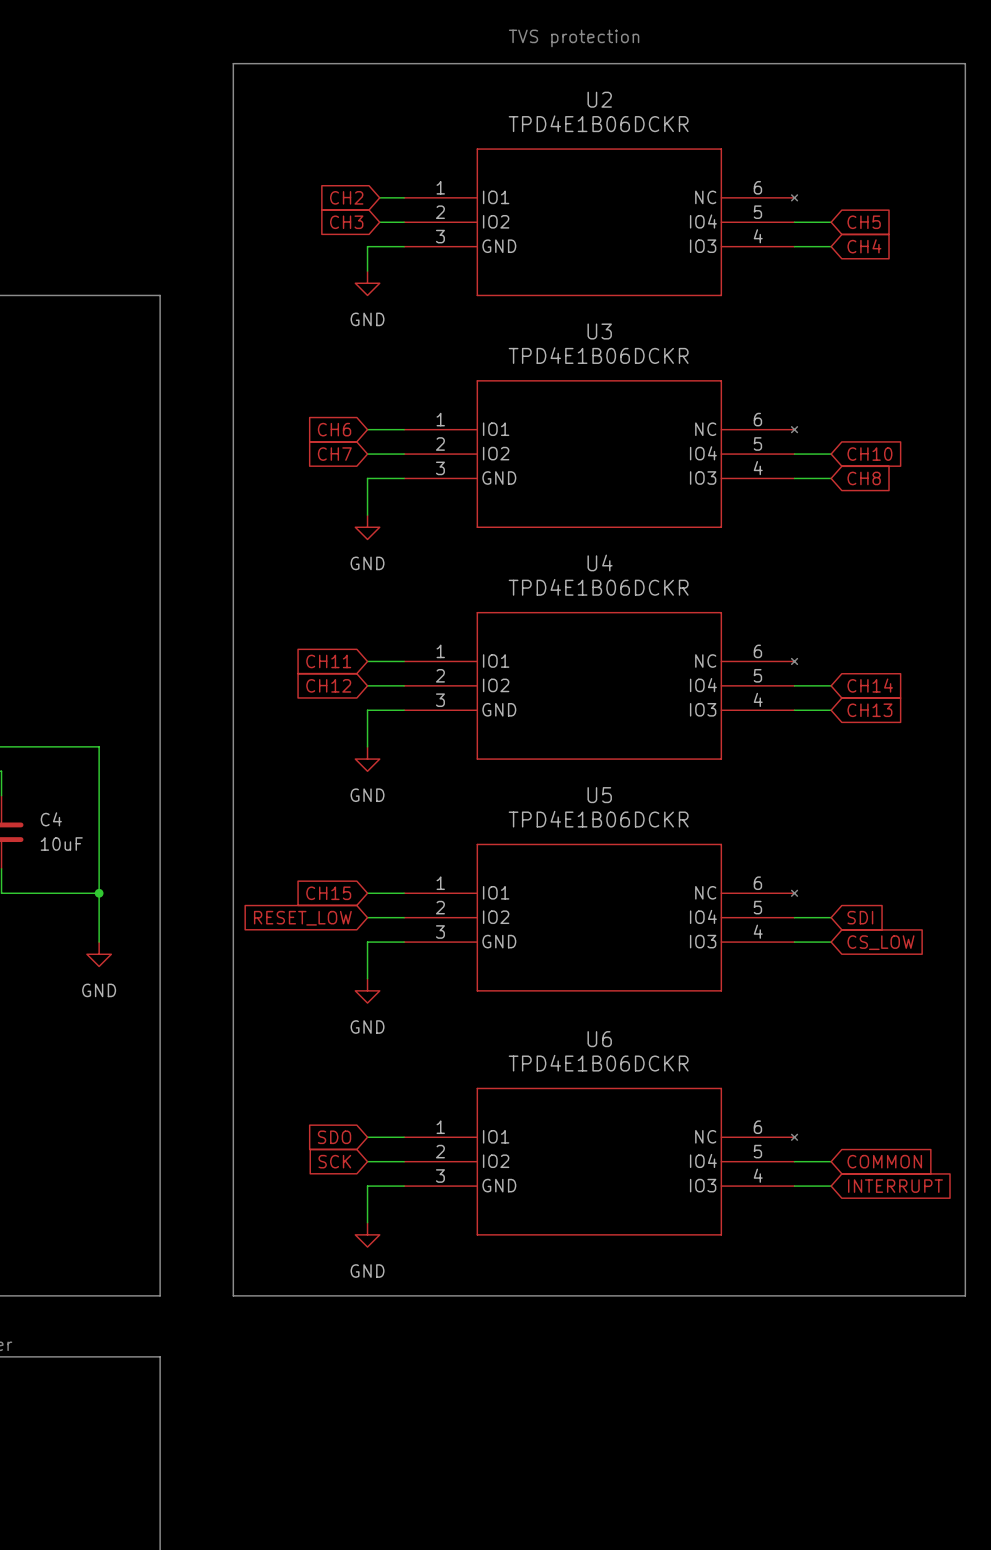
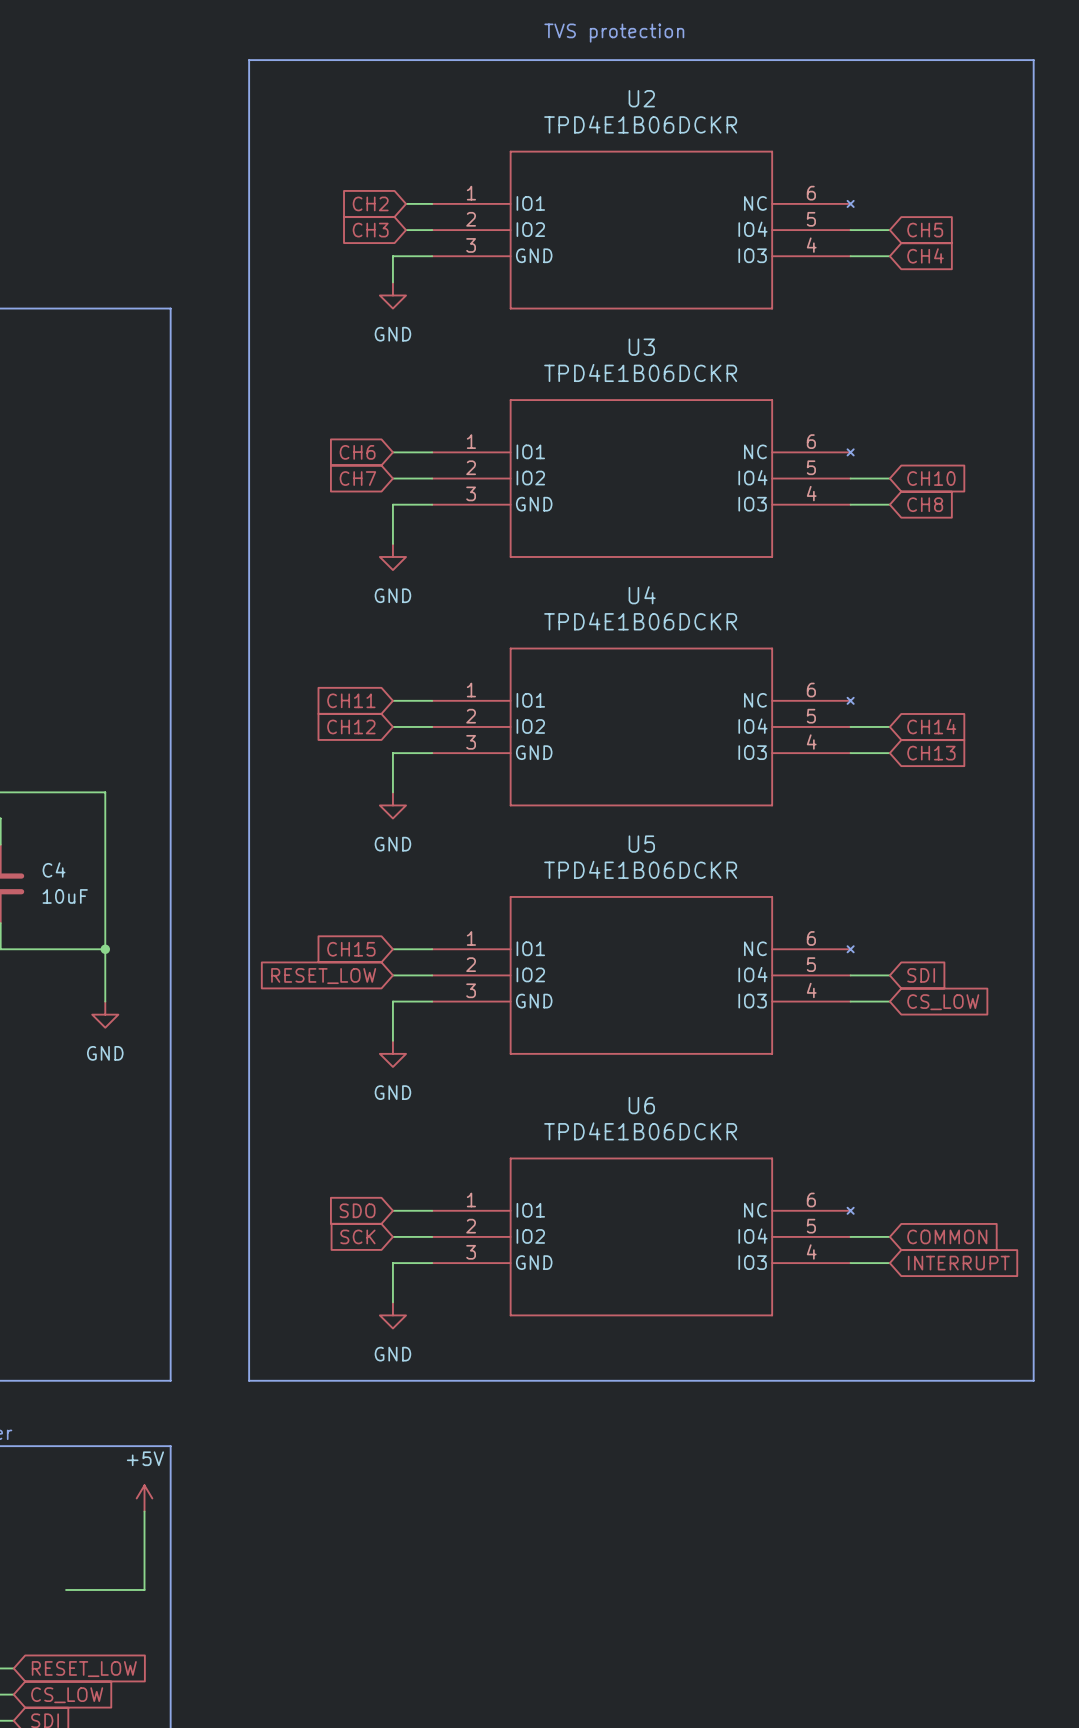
power symbol: none -> +5V (144, 1498)
wire: none -> (144, 1511) (144, 1589) (66, 1589)

